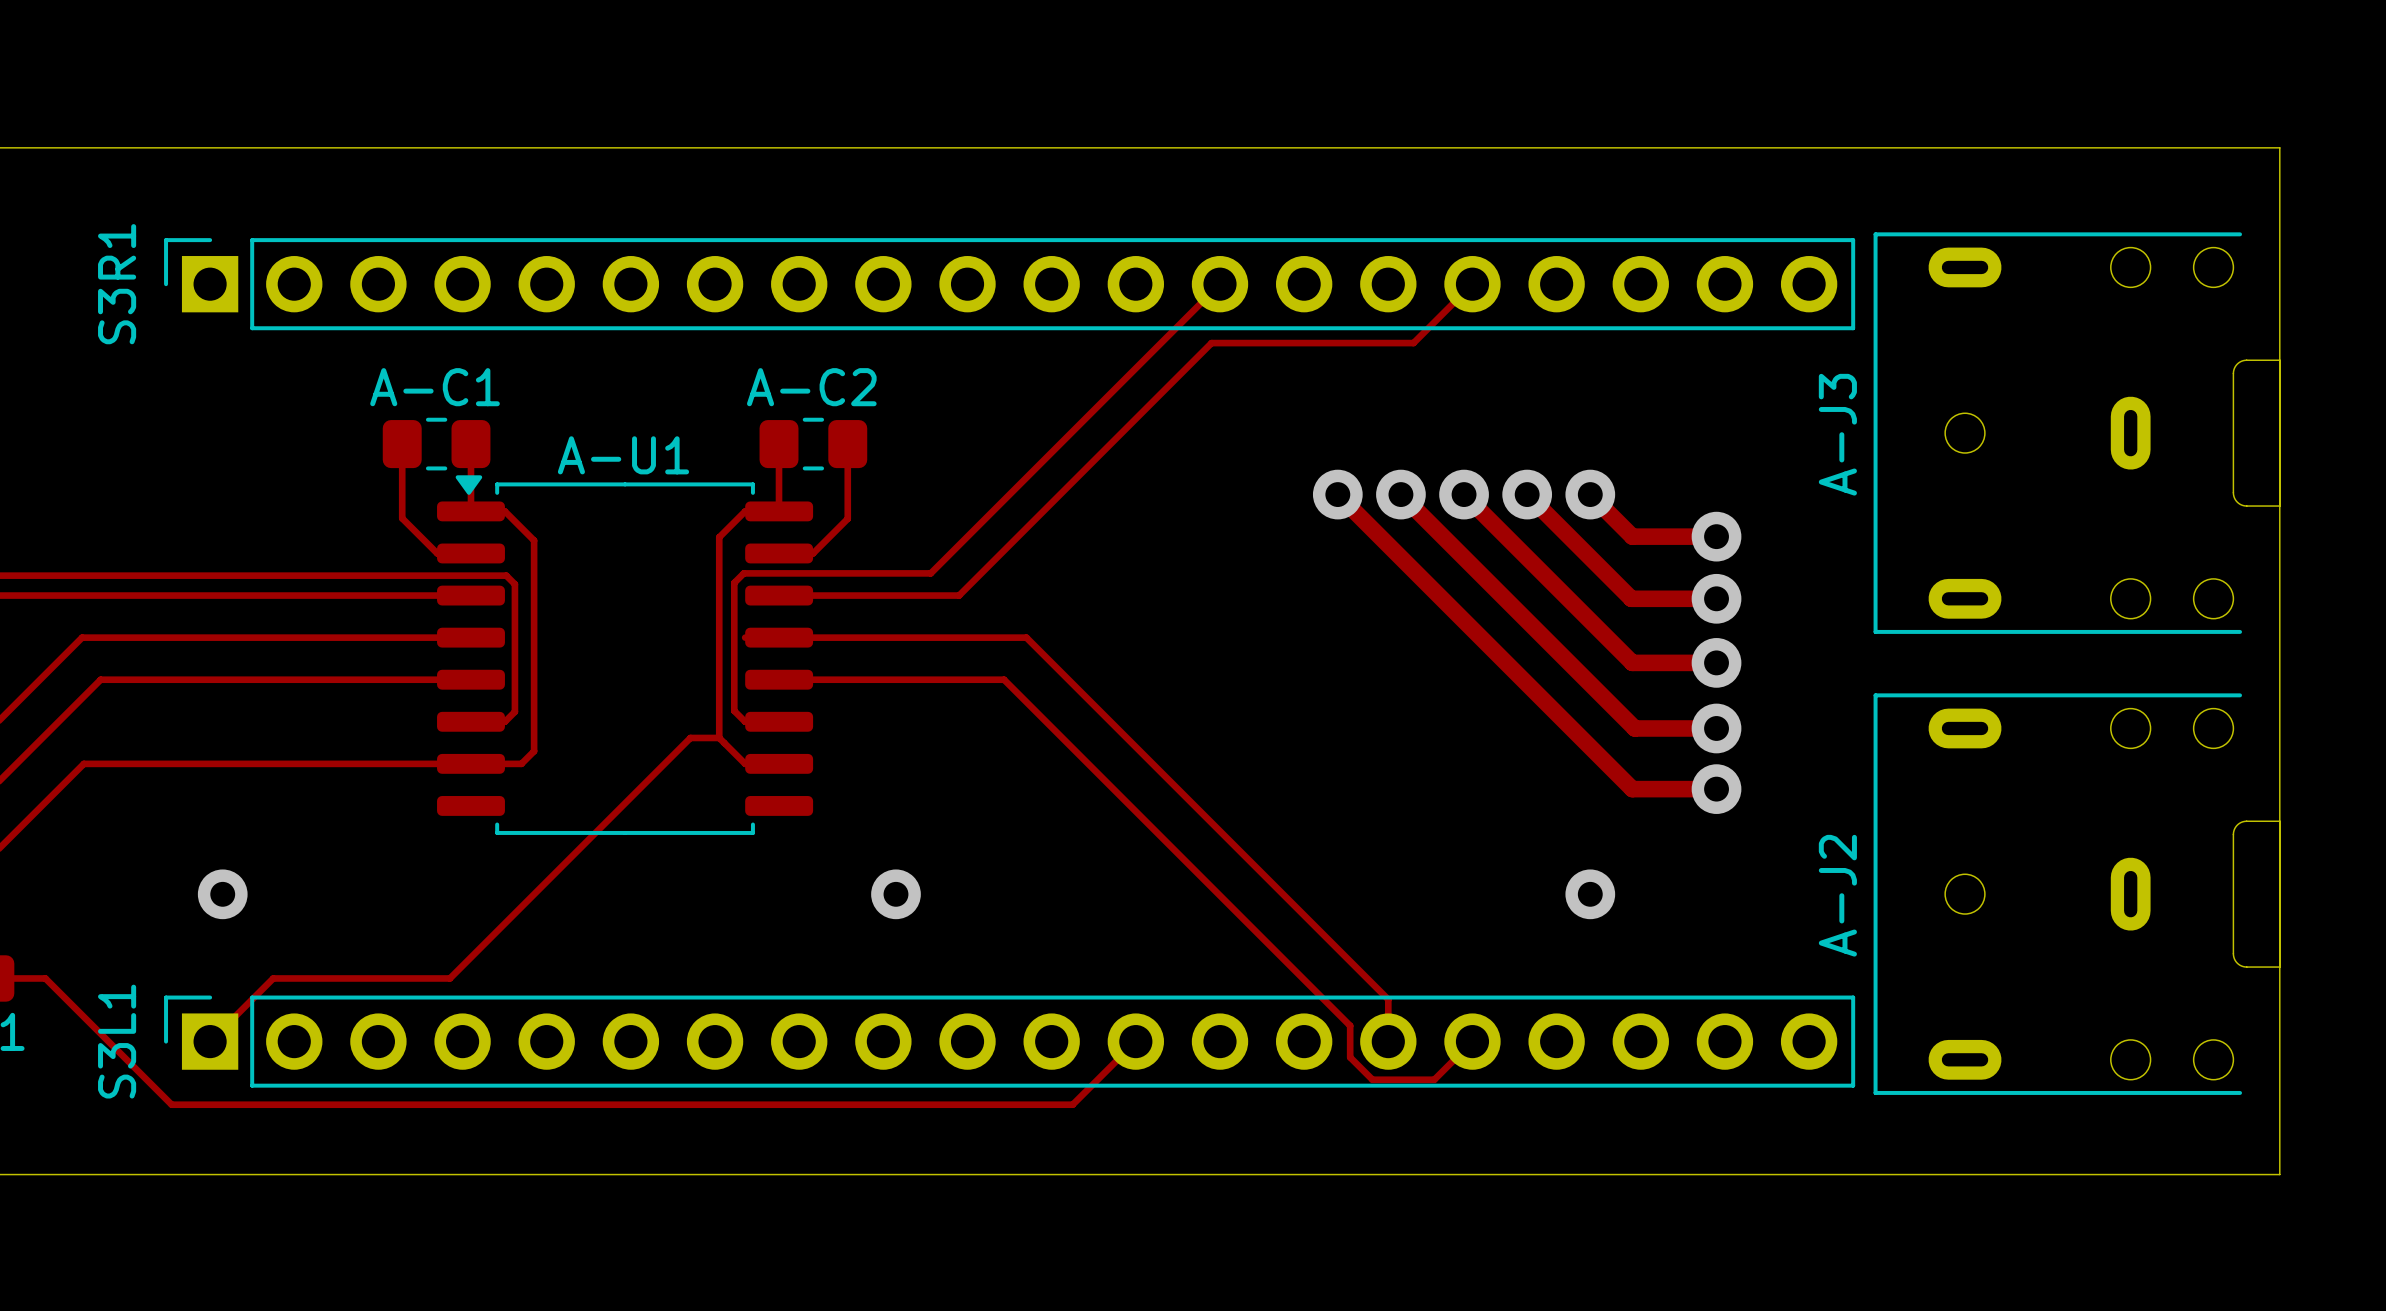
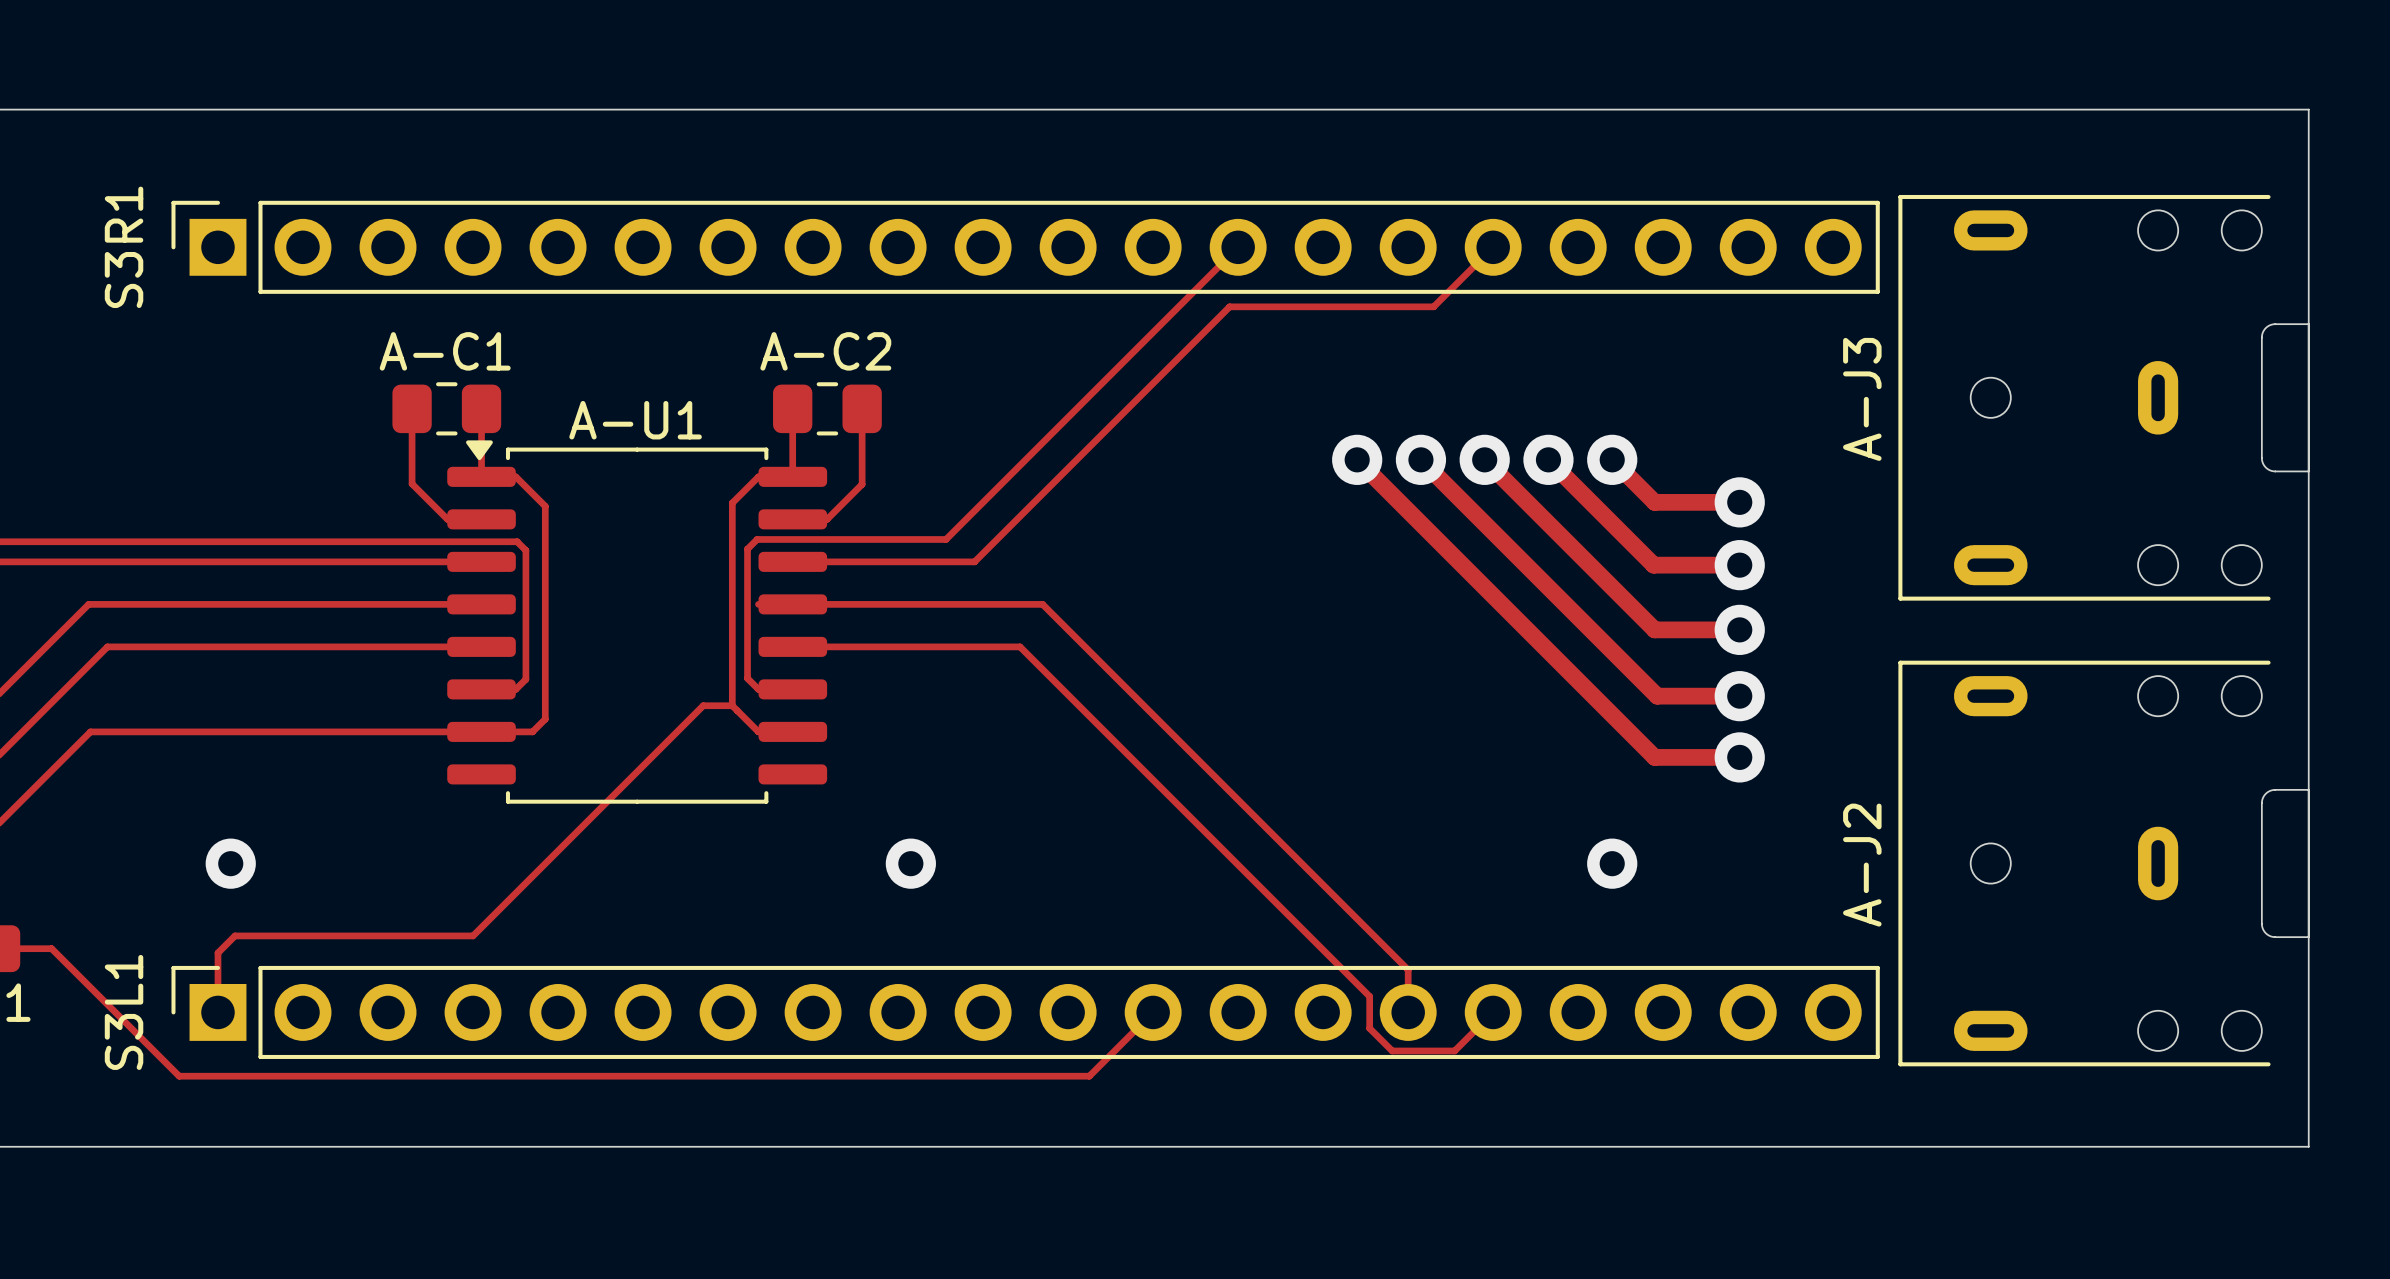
track: (462, 965) (449, 978) (273, 978) (210, 1041) -> (473, 935) (235, 935) (217, 952) (217, 1012)

